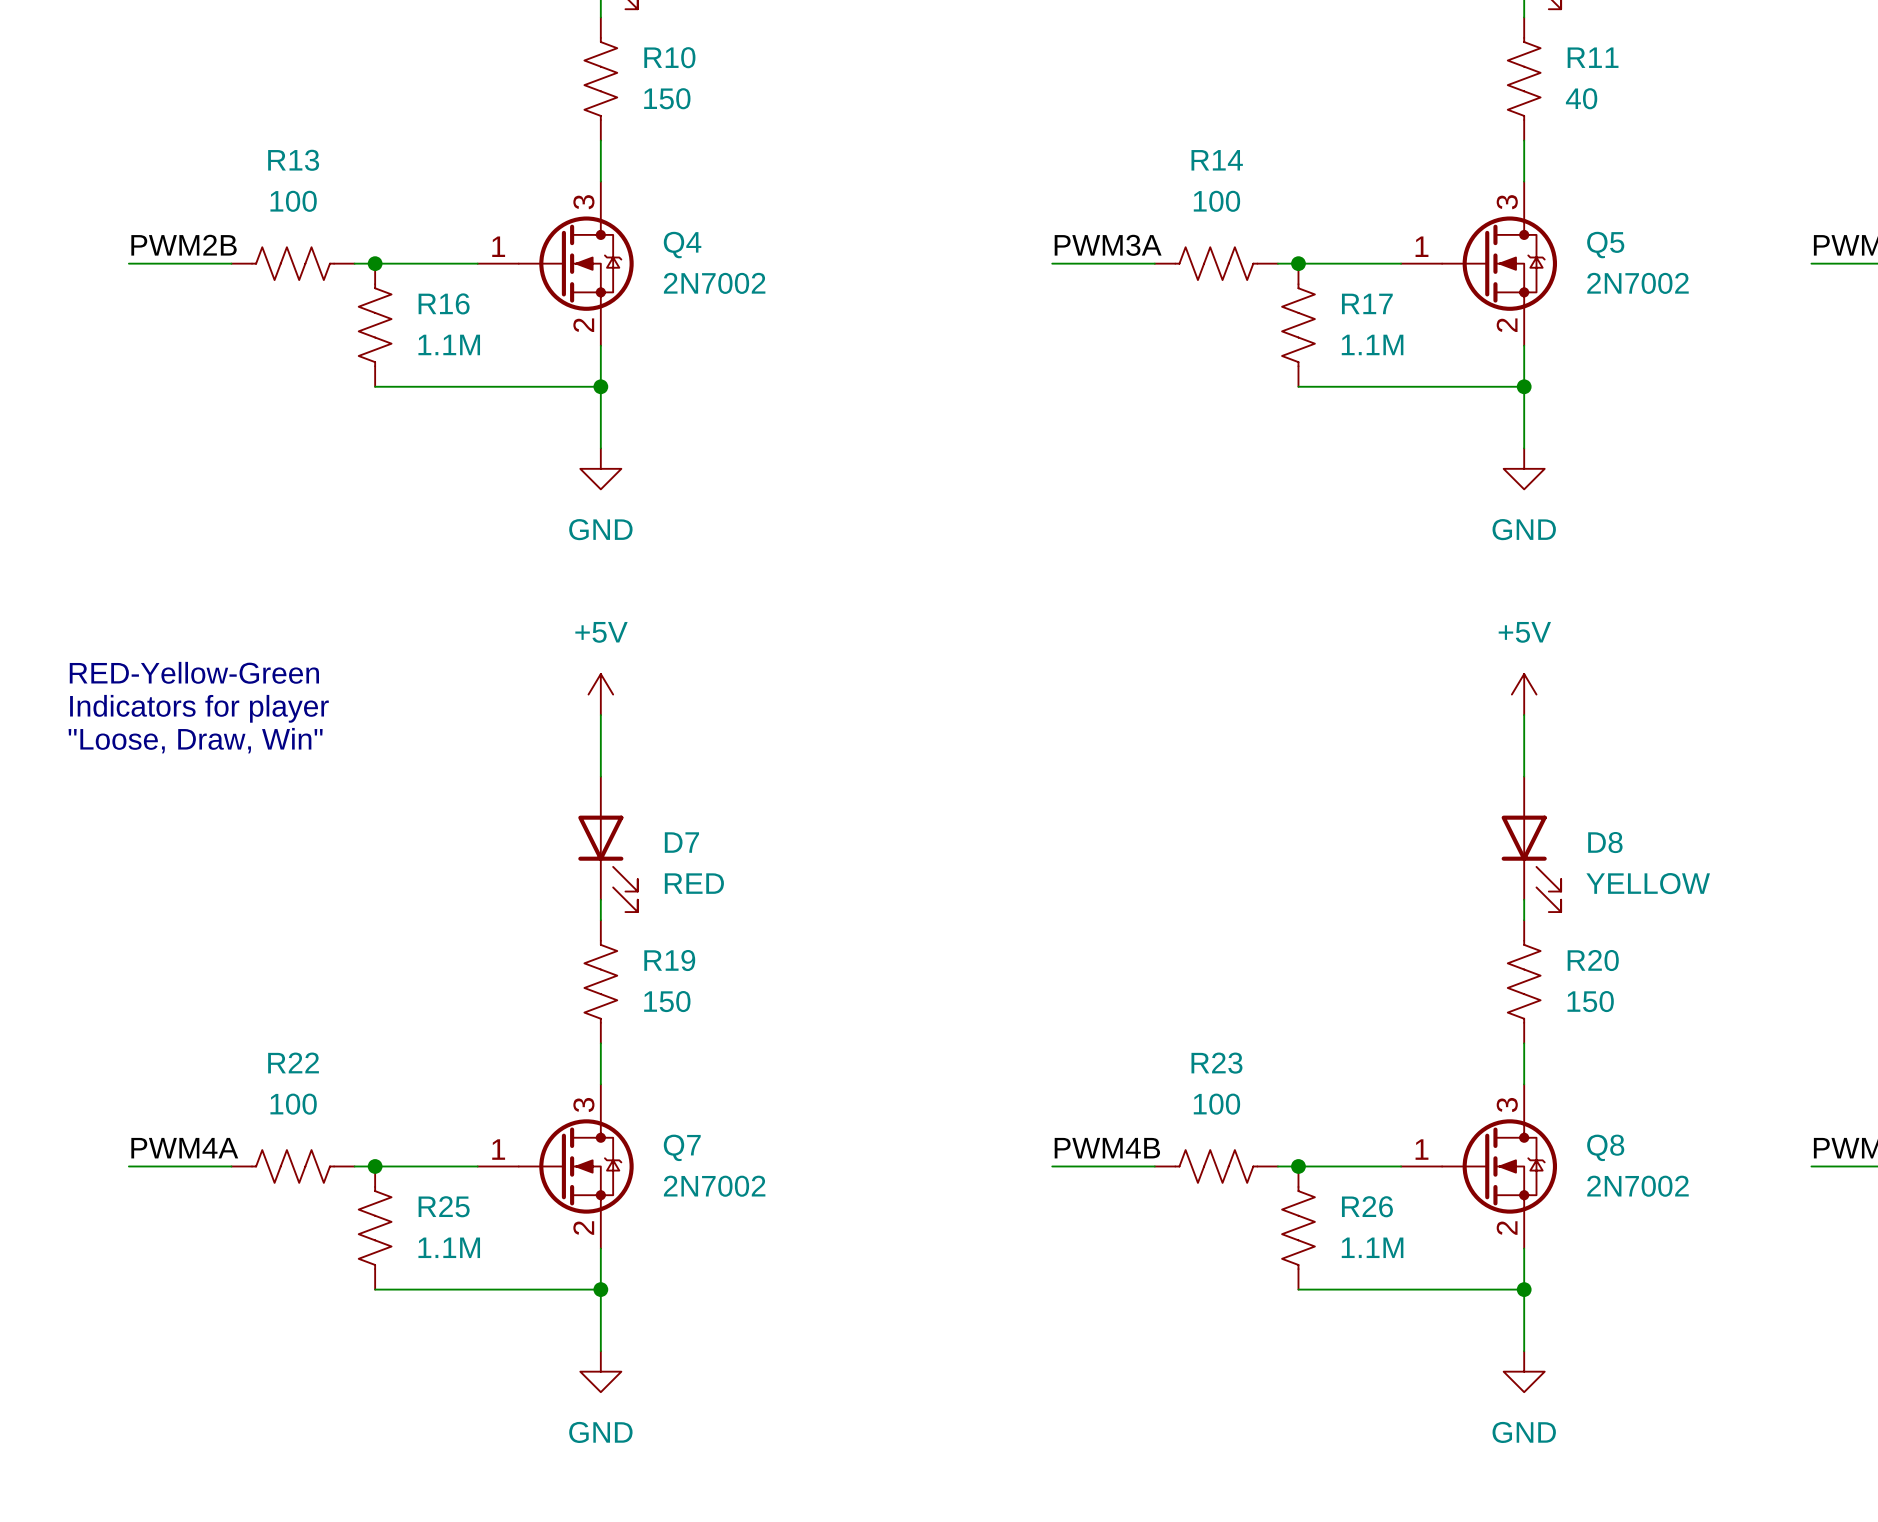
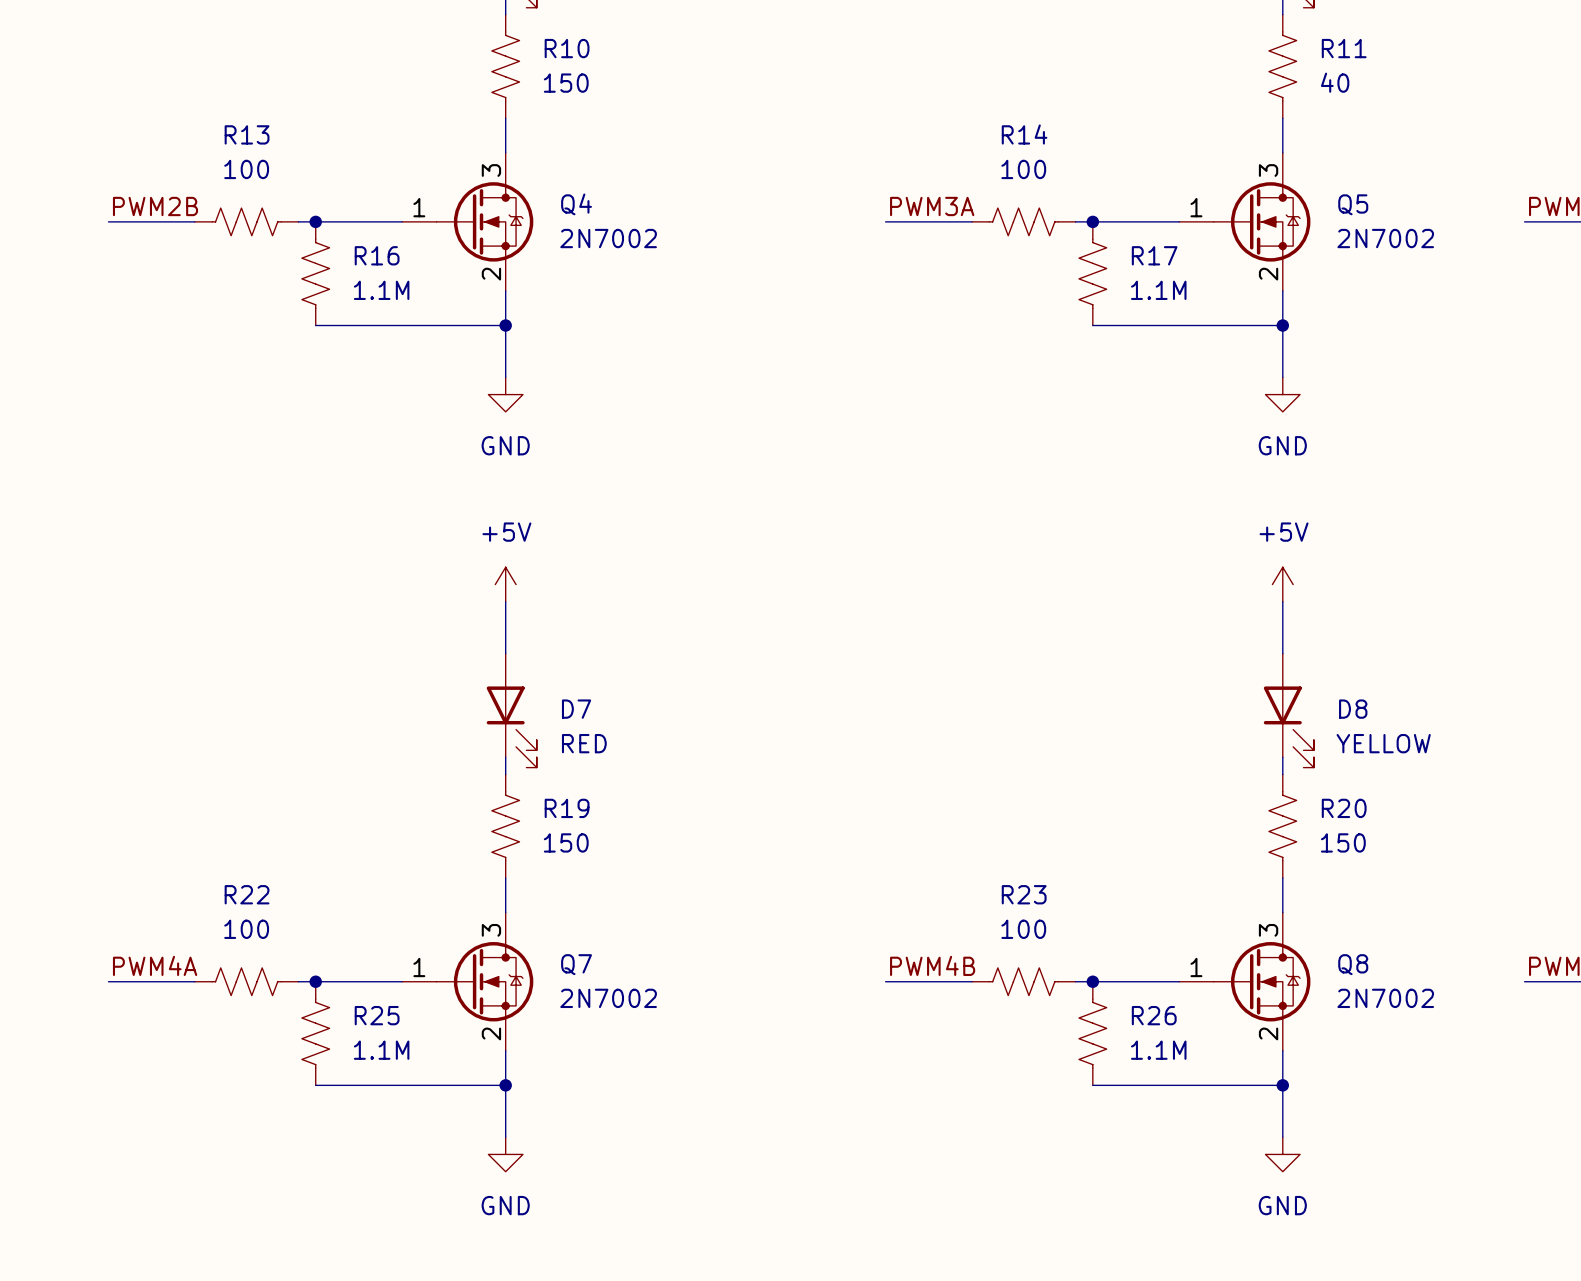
text: RED-Yellow-Green (194, 672) -> none
text: Indicators for player (199, 708) -> none
text: "Loose, Draw, Win" (195, 740) -> none

